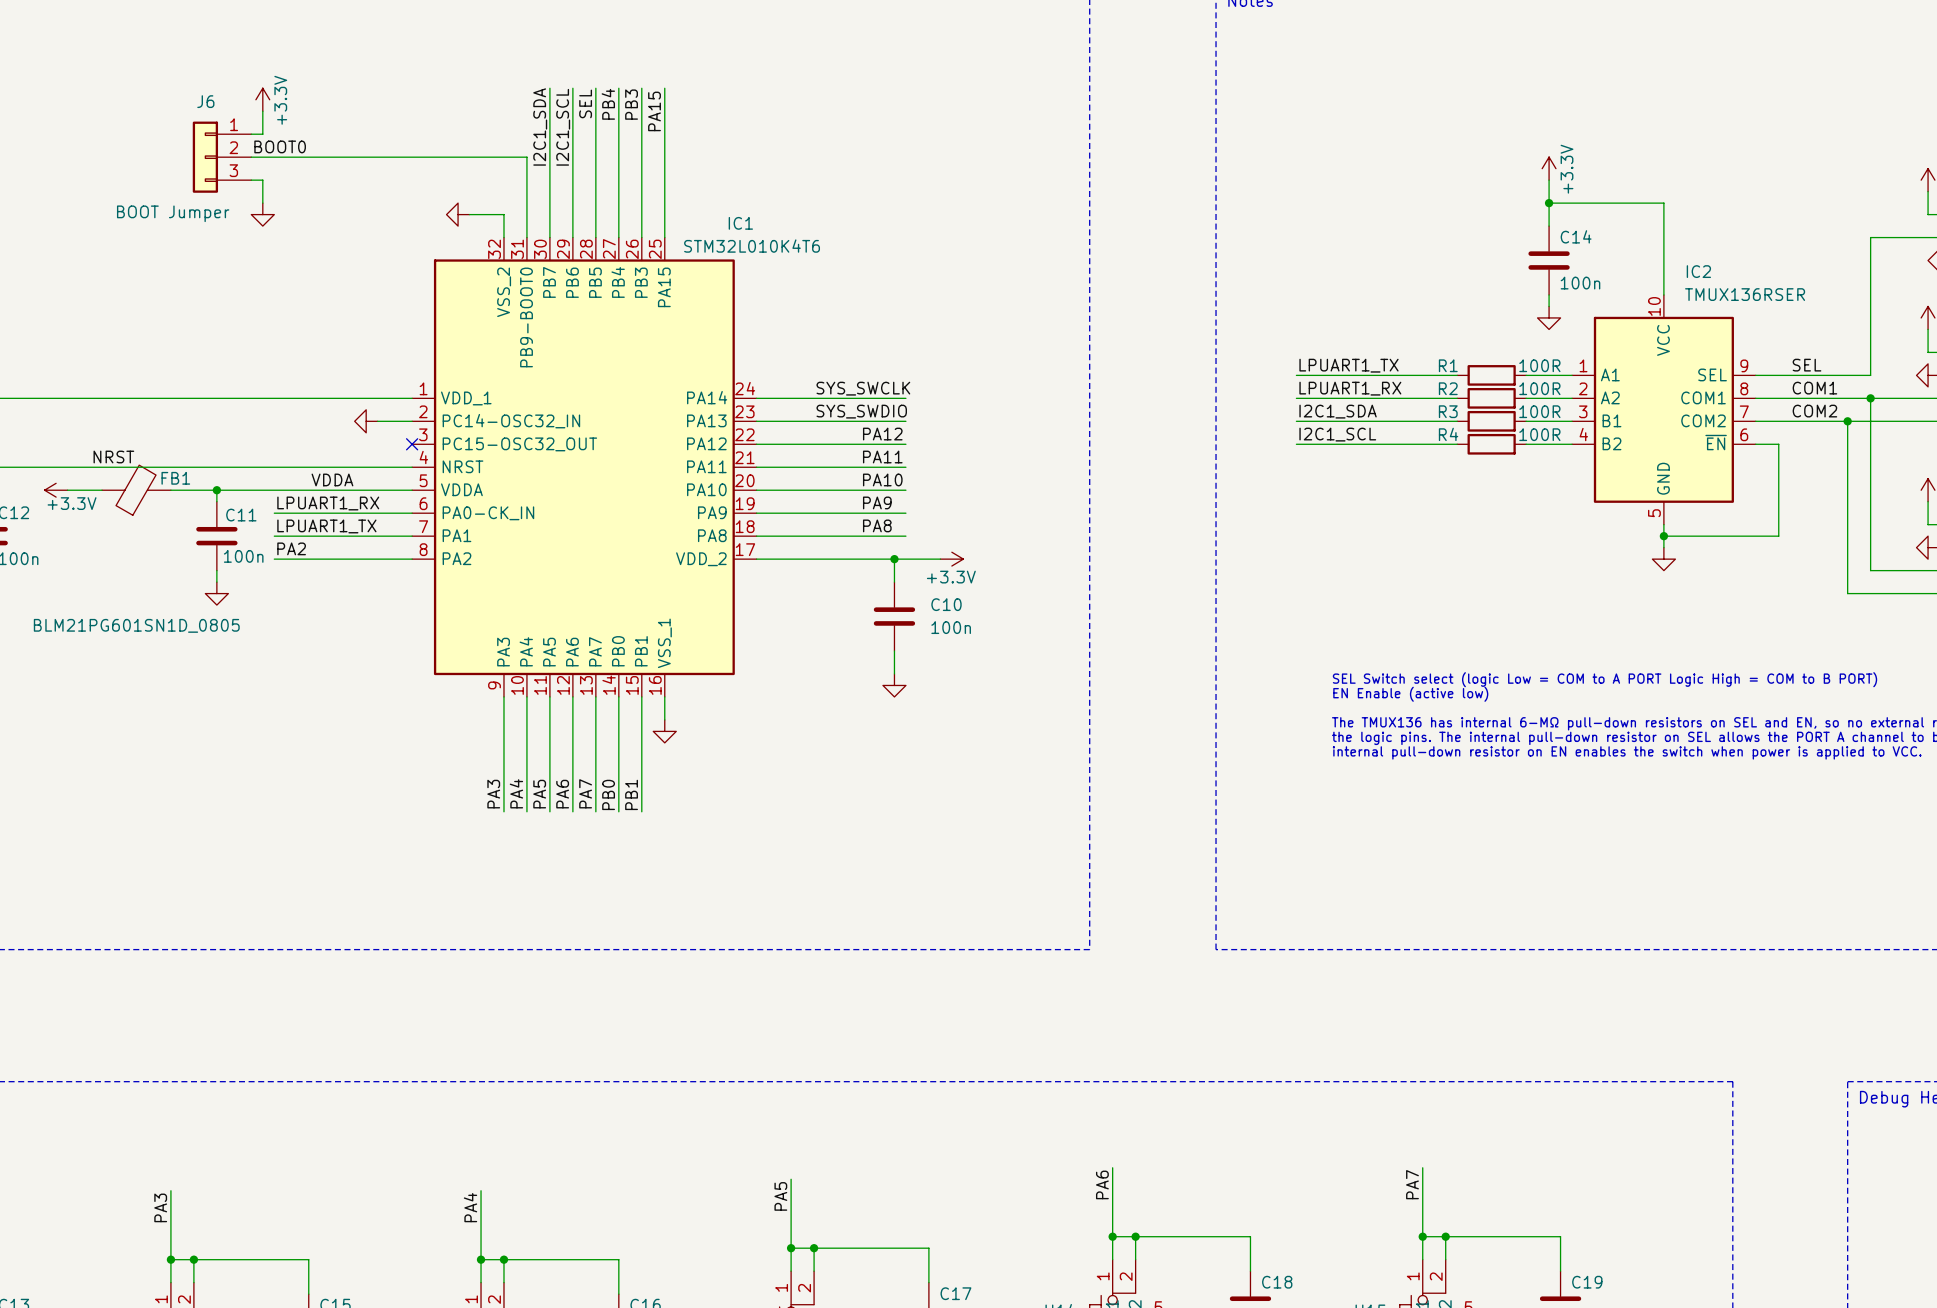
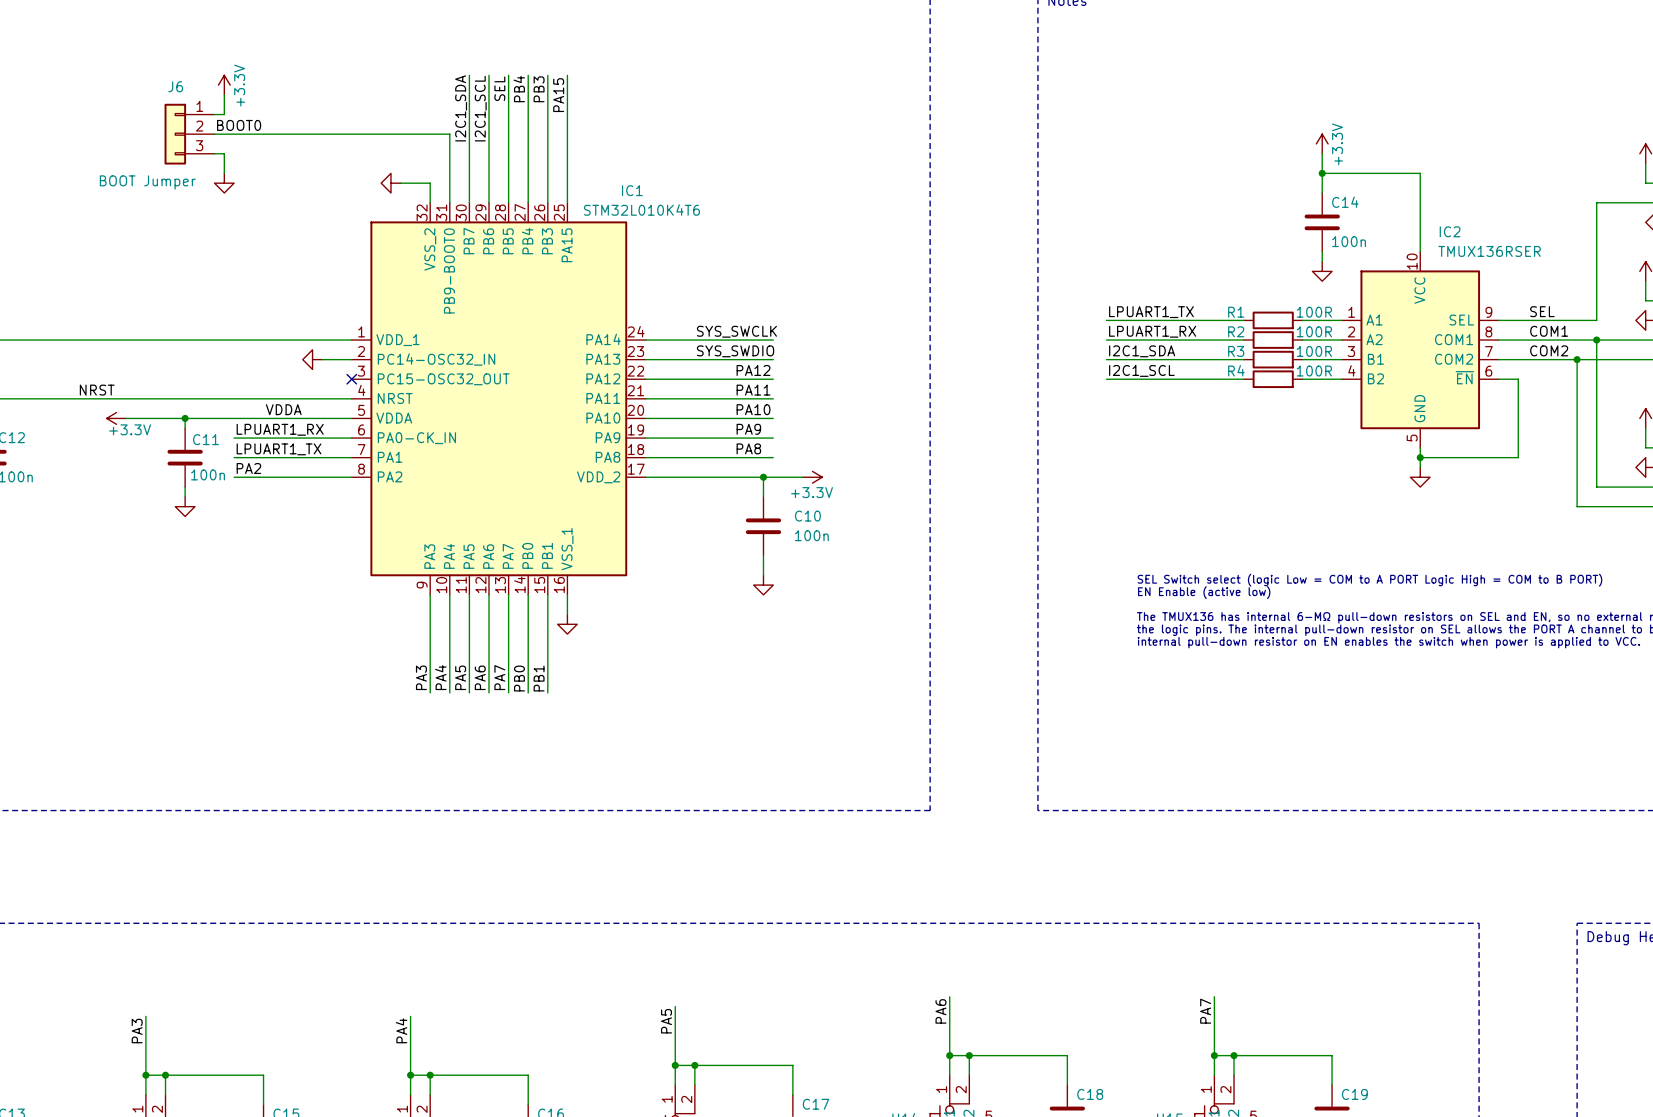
power symbol position: +3.3V (56, 490) -> +3.3V (116, 418)
wire: (67, 490) (102, 490) -> none
FB1: BLM21PG601SN1D_0805 (136, 490) -> none

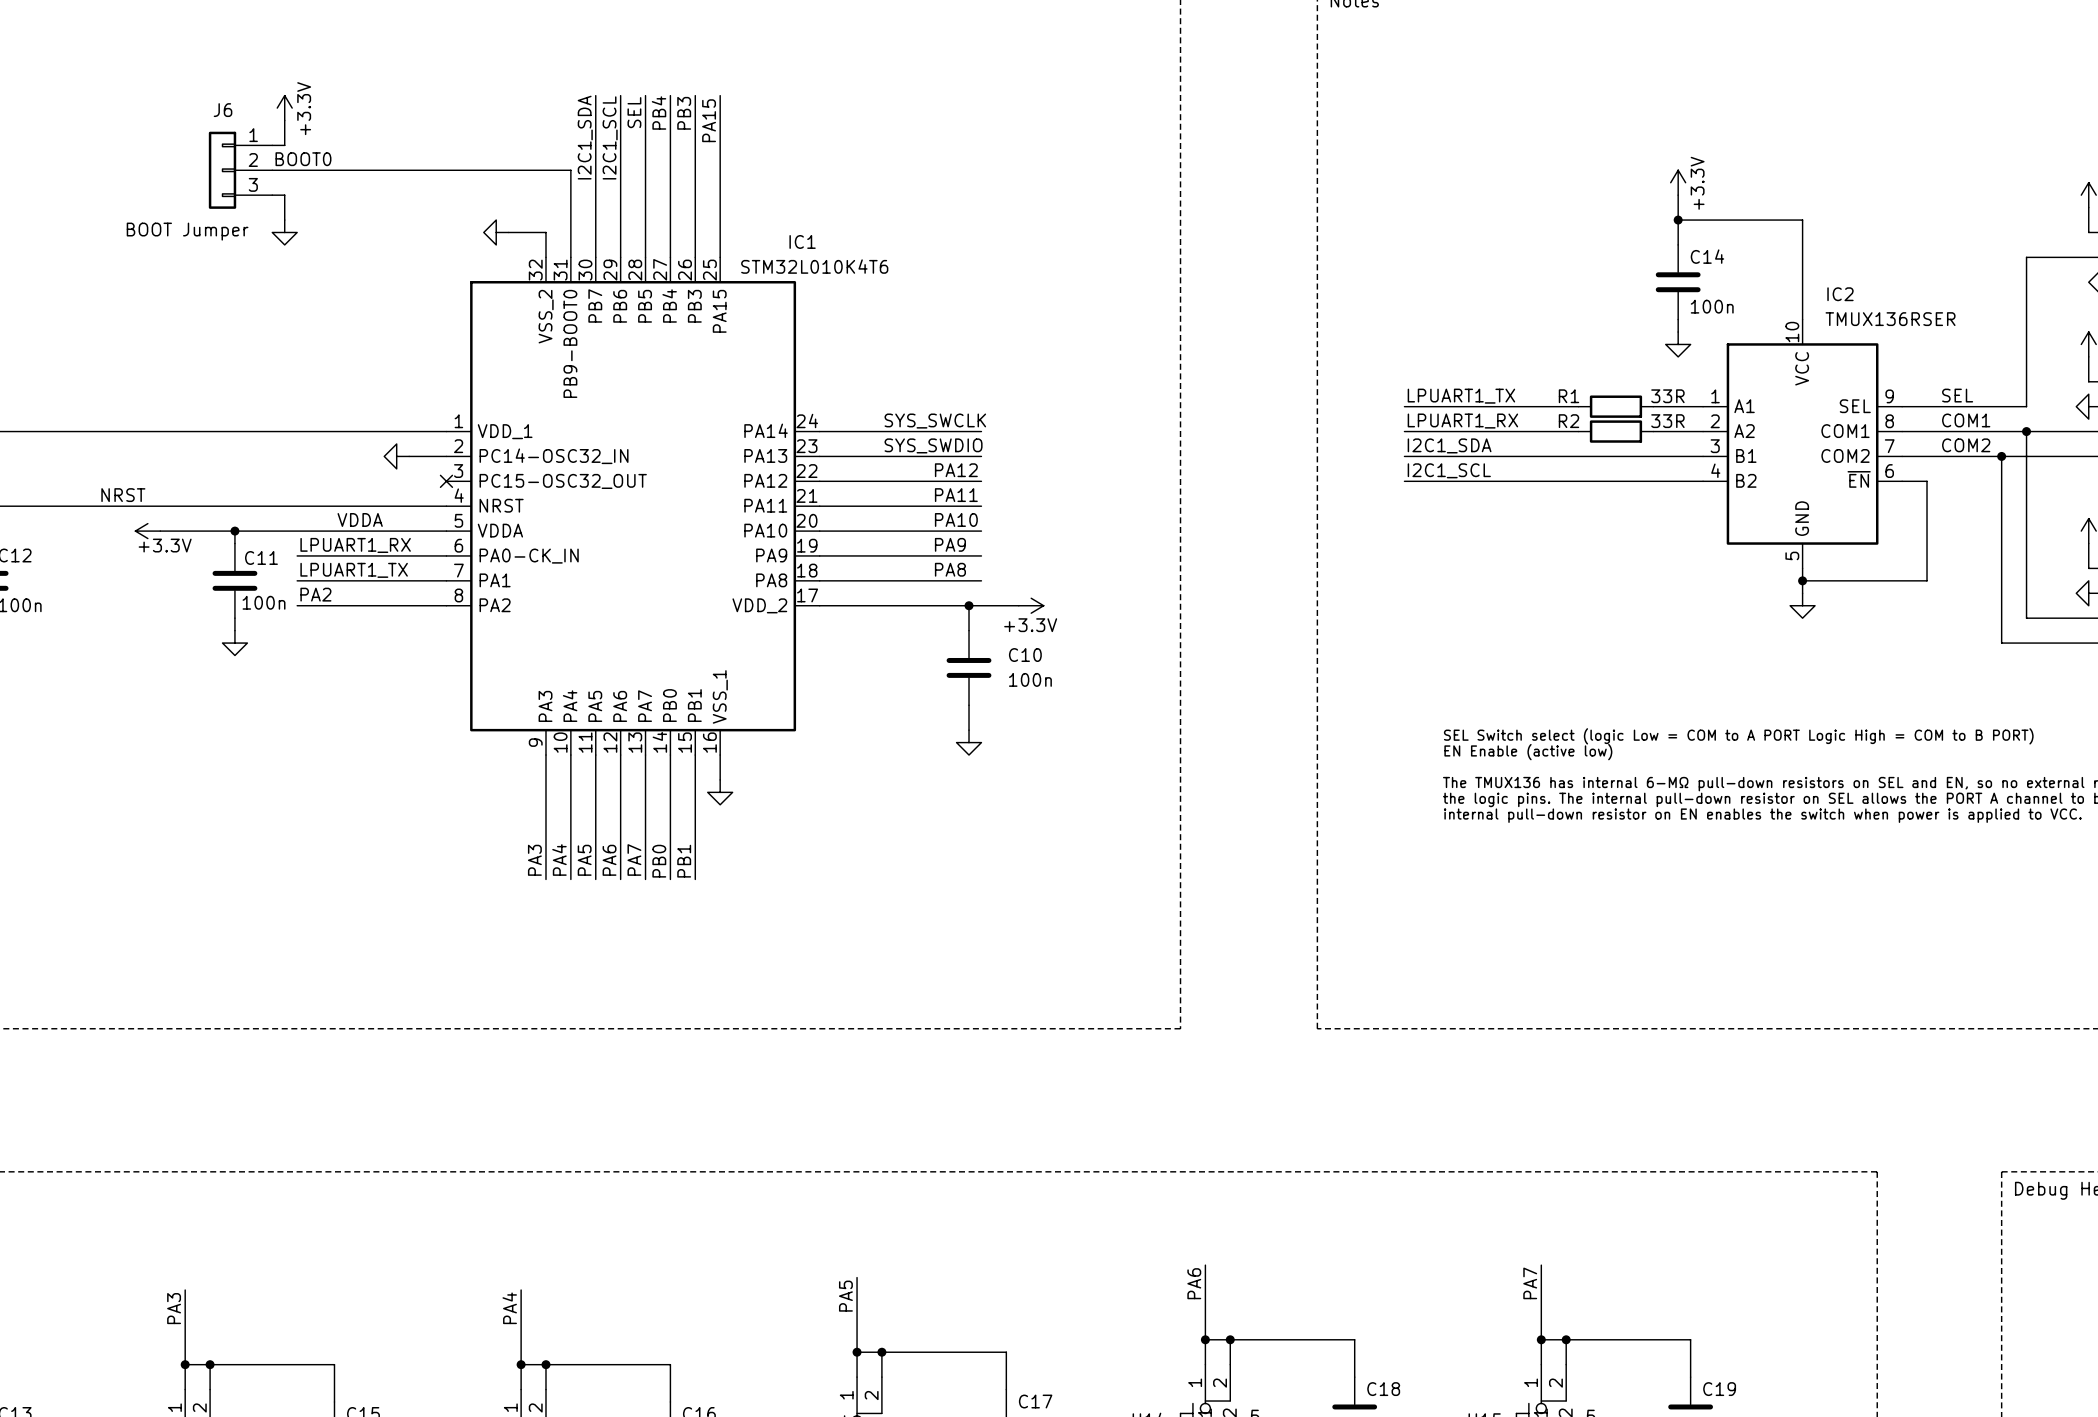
R1 value: 100R (1314, 312) -> 33R (1667, 396)
R2 value: 100R (1314, 331) -> 33R (1667, 421)
wire: none -> (1578, 456) (1653, 456)
R3: 100R (1273, 359) -> none
wire: none -> (1578, 481) (1653, 481)
R4: 100R (1273, 379) -> none

